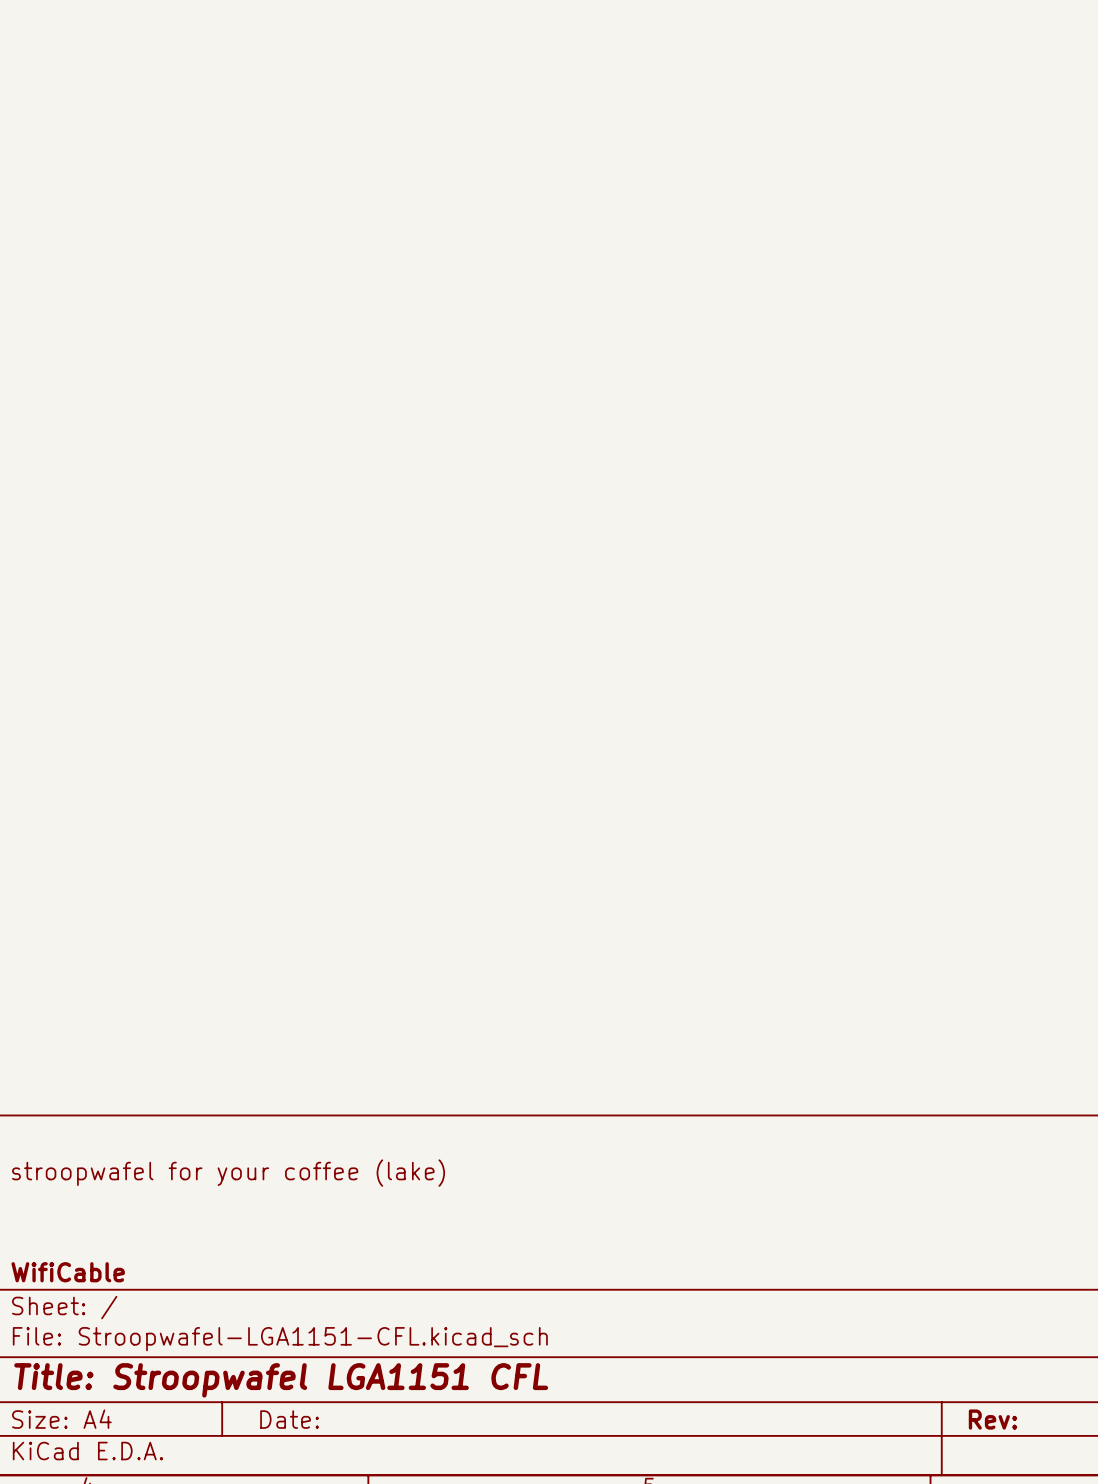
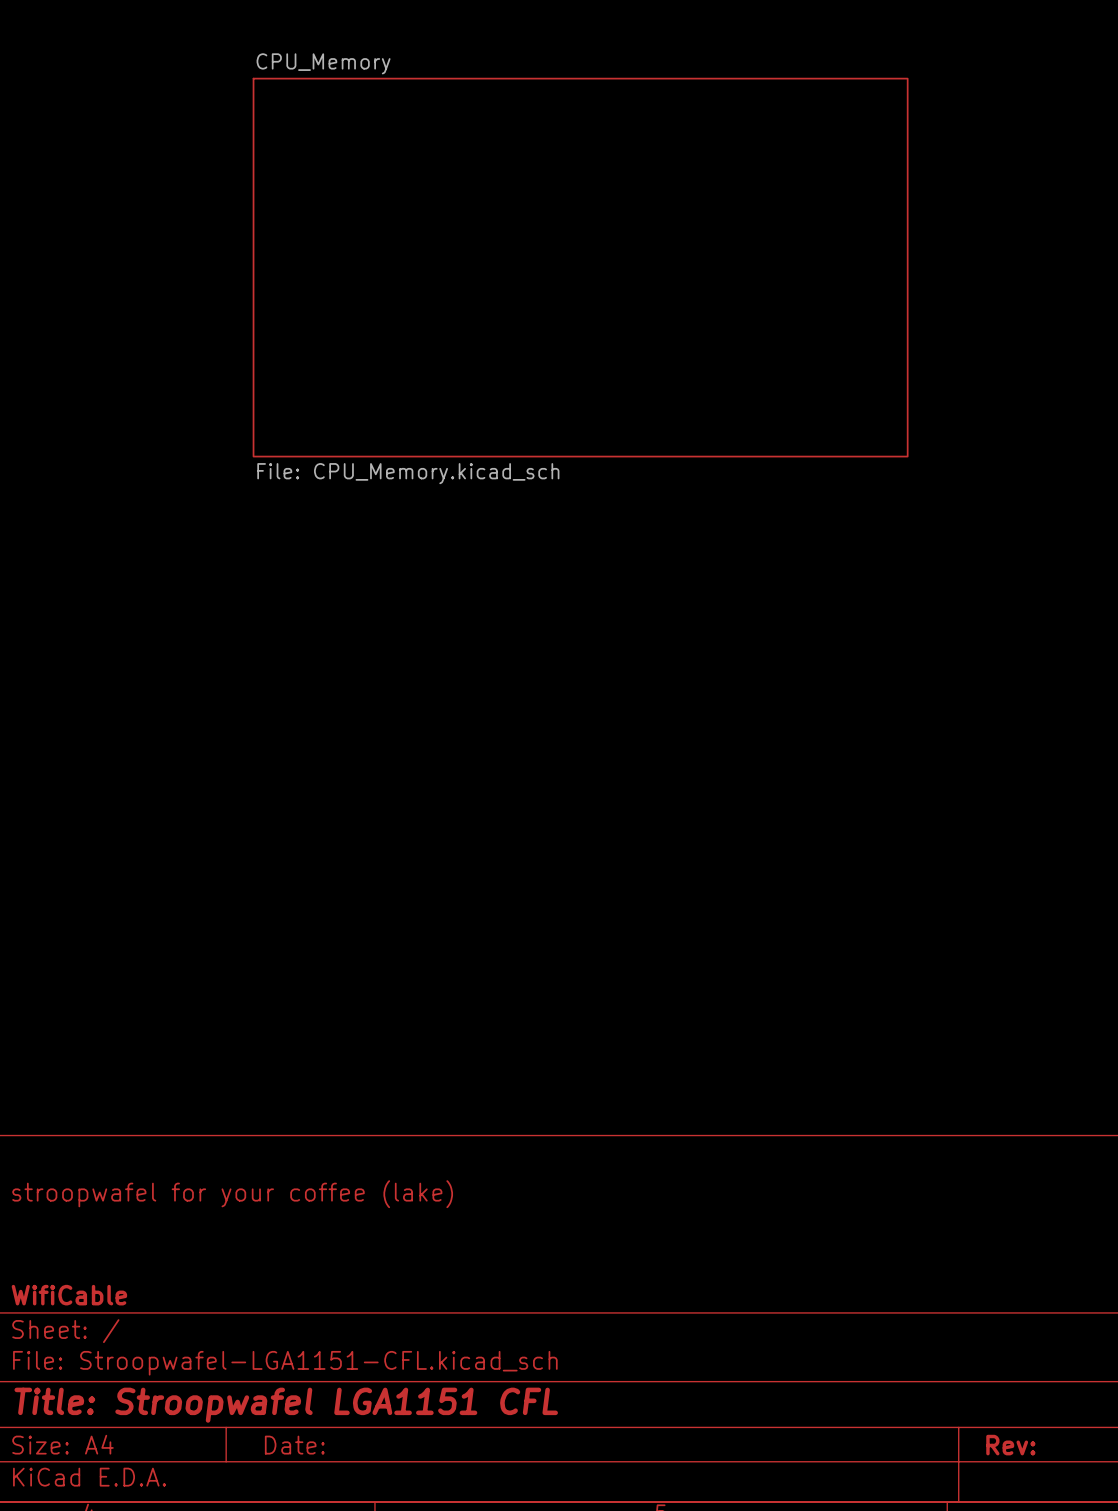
sheet CPU_Memory: none -> File: CPU_Memory.kicad_sch (580, 267)

